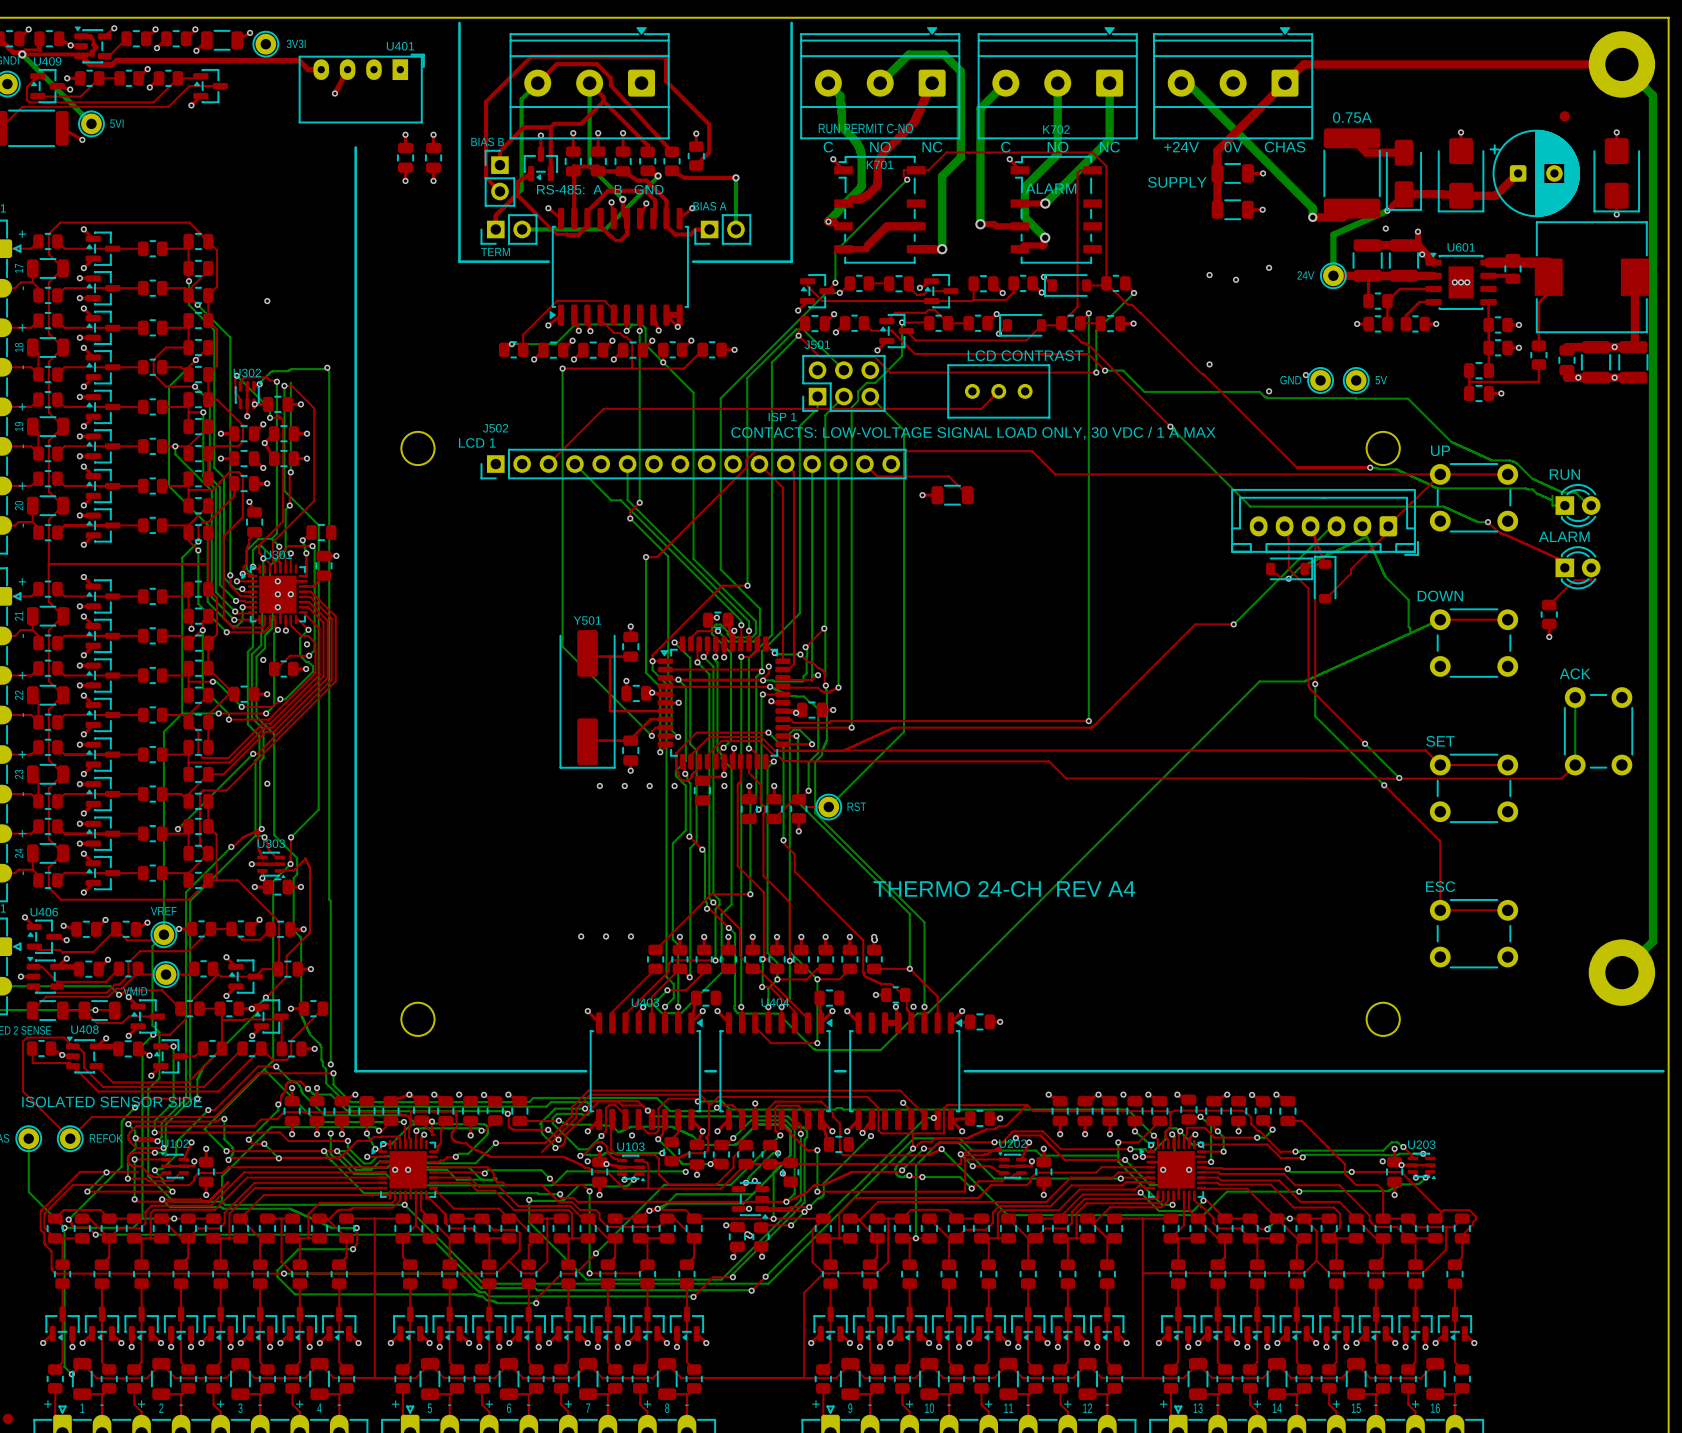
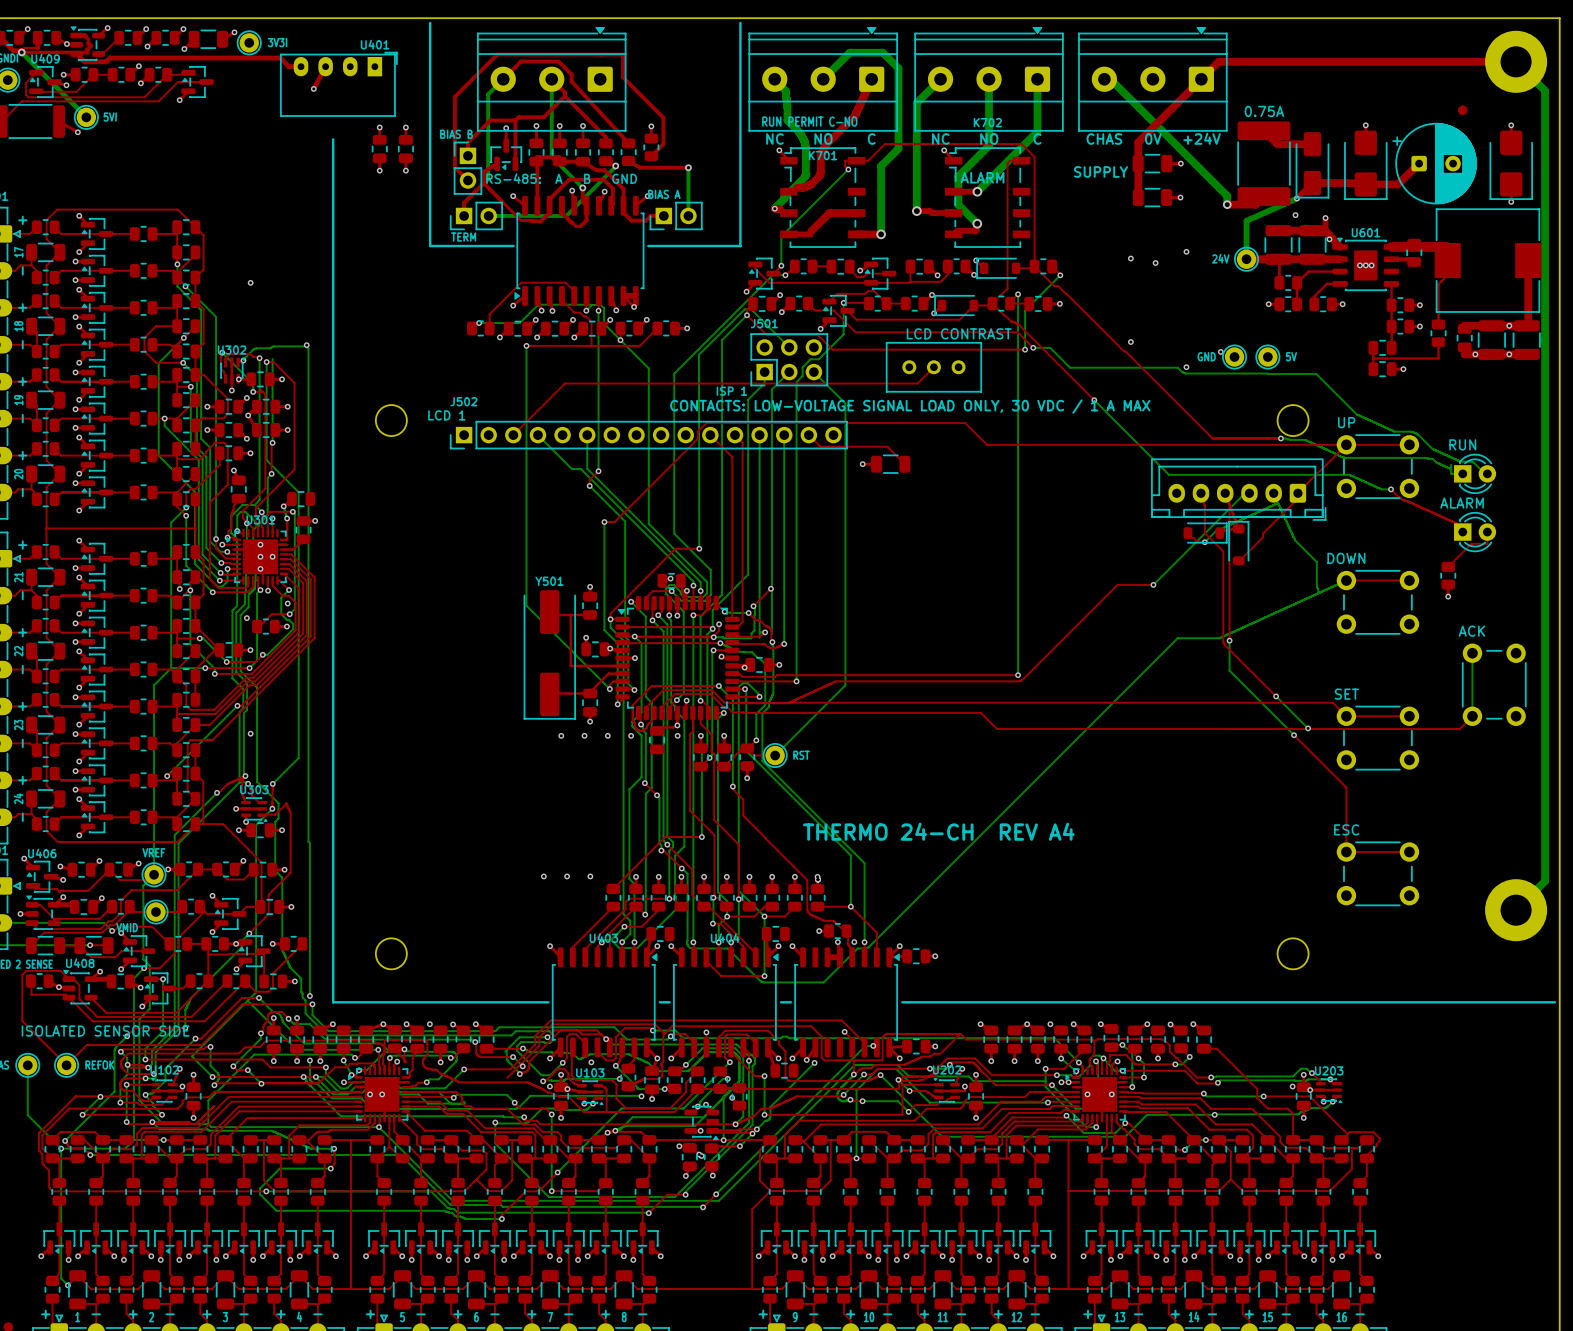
text: C (828, 147) -> NC (774, 139)
text: NC (932, 147) -> C (871, 139)
text: C (1005, 147) -> NC (940, 139)
text: NC (1109, 147) -> C (1037, 139)
text: +24V (1181, 147) -> CHAS (1104, 139)
text: CHAS (1285, 147) -> +24V (1202, 138)

